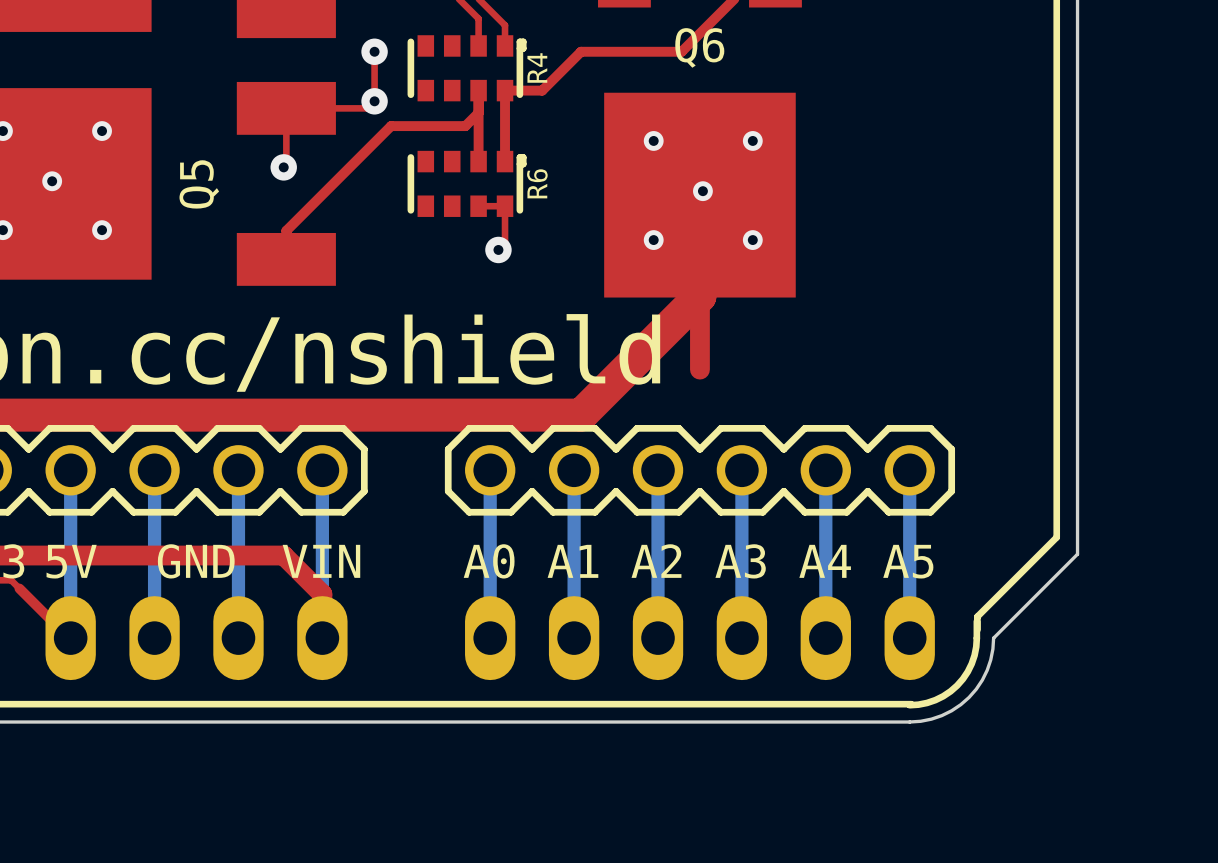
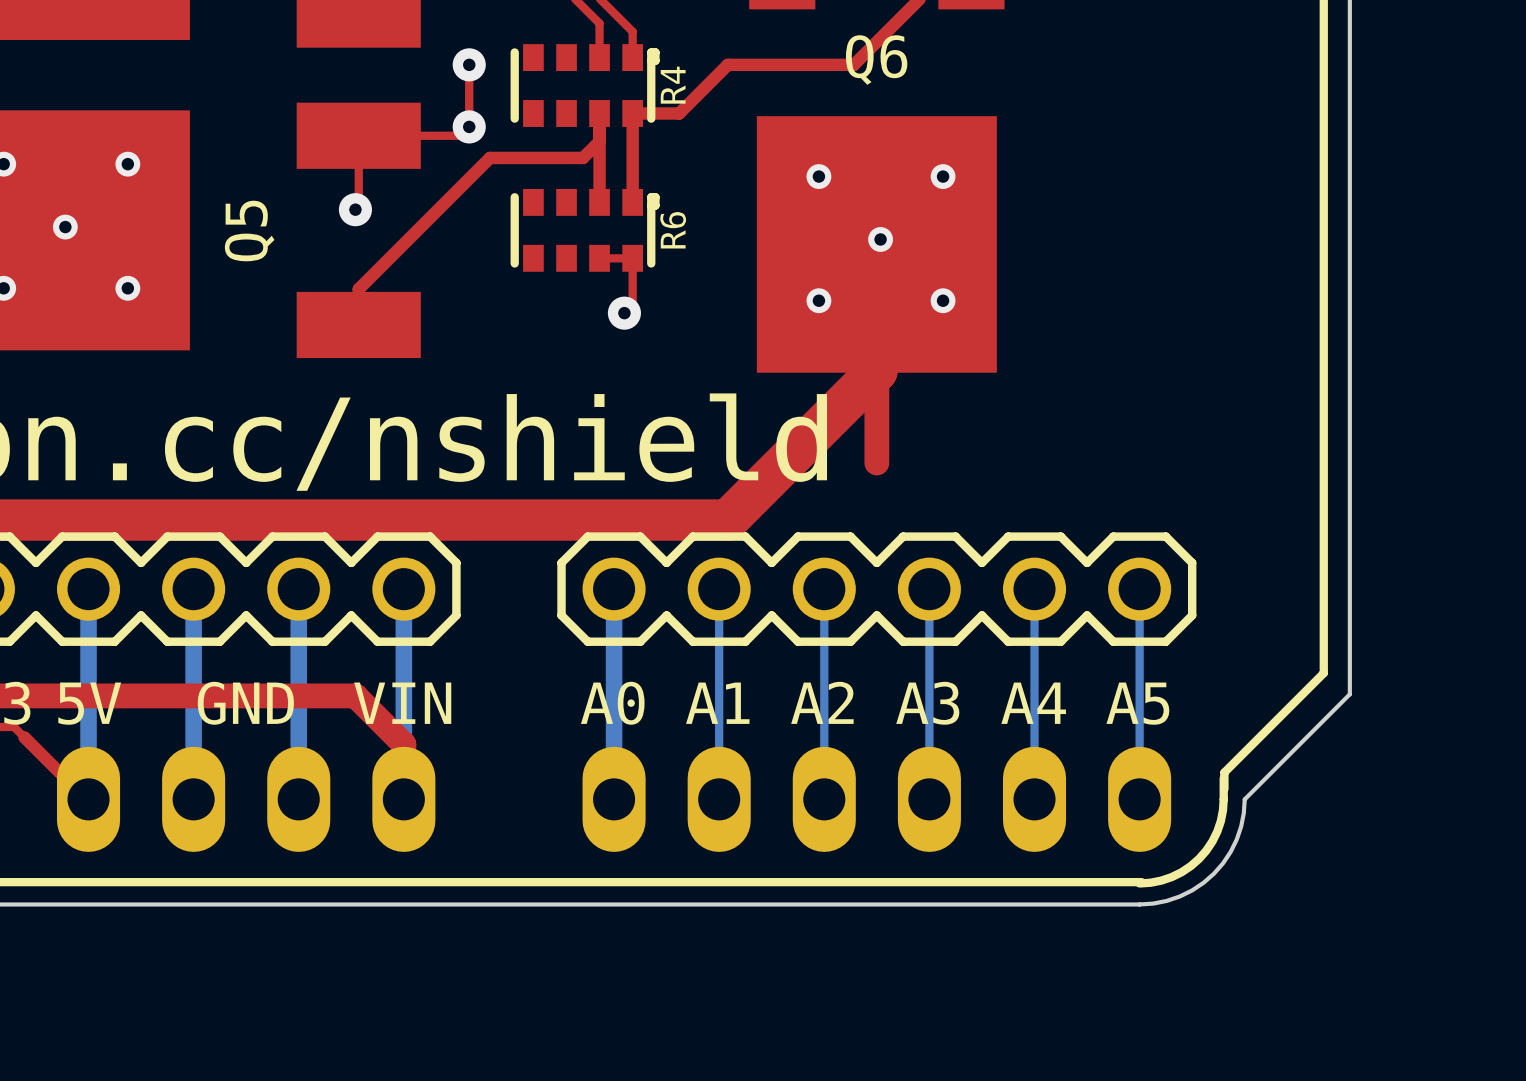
bottom track width: thick (574, 487) (574, 638) -> thin (719, 610) (719, 799)
bottom track width: thick (658, 487) (658, 638) -> thin (824, 610) (824, 799)
bottom track width: thick (741, 487) (741, 638) -> thin (929, 610) (929, 799)
bottom track width: thick (825, 487) (825, 638) -> thin (1034, 610) (1034, 799)
bottom track width: thick (909, 487) (909, 638) -> thin (1139, 610) (1139, 799)

